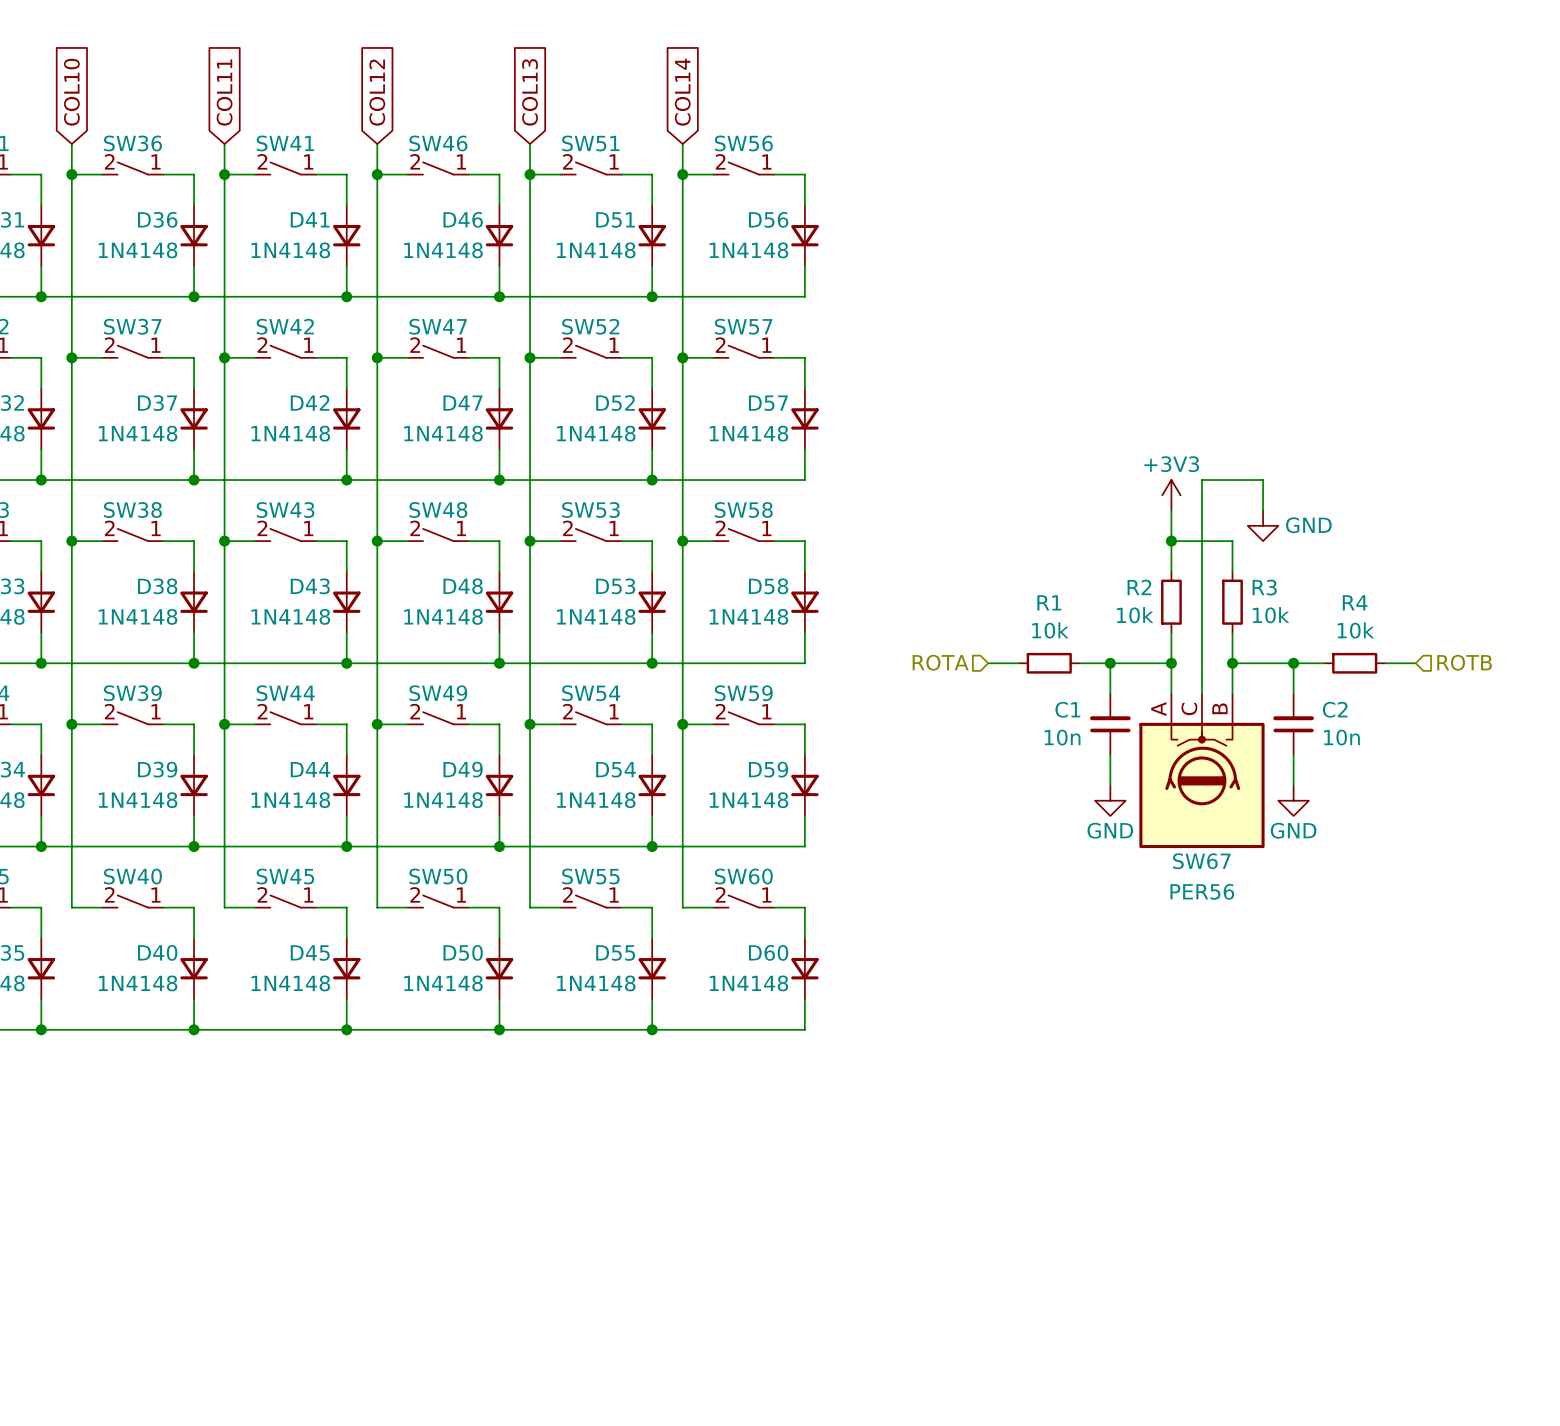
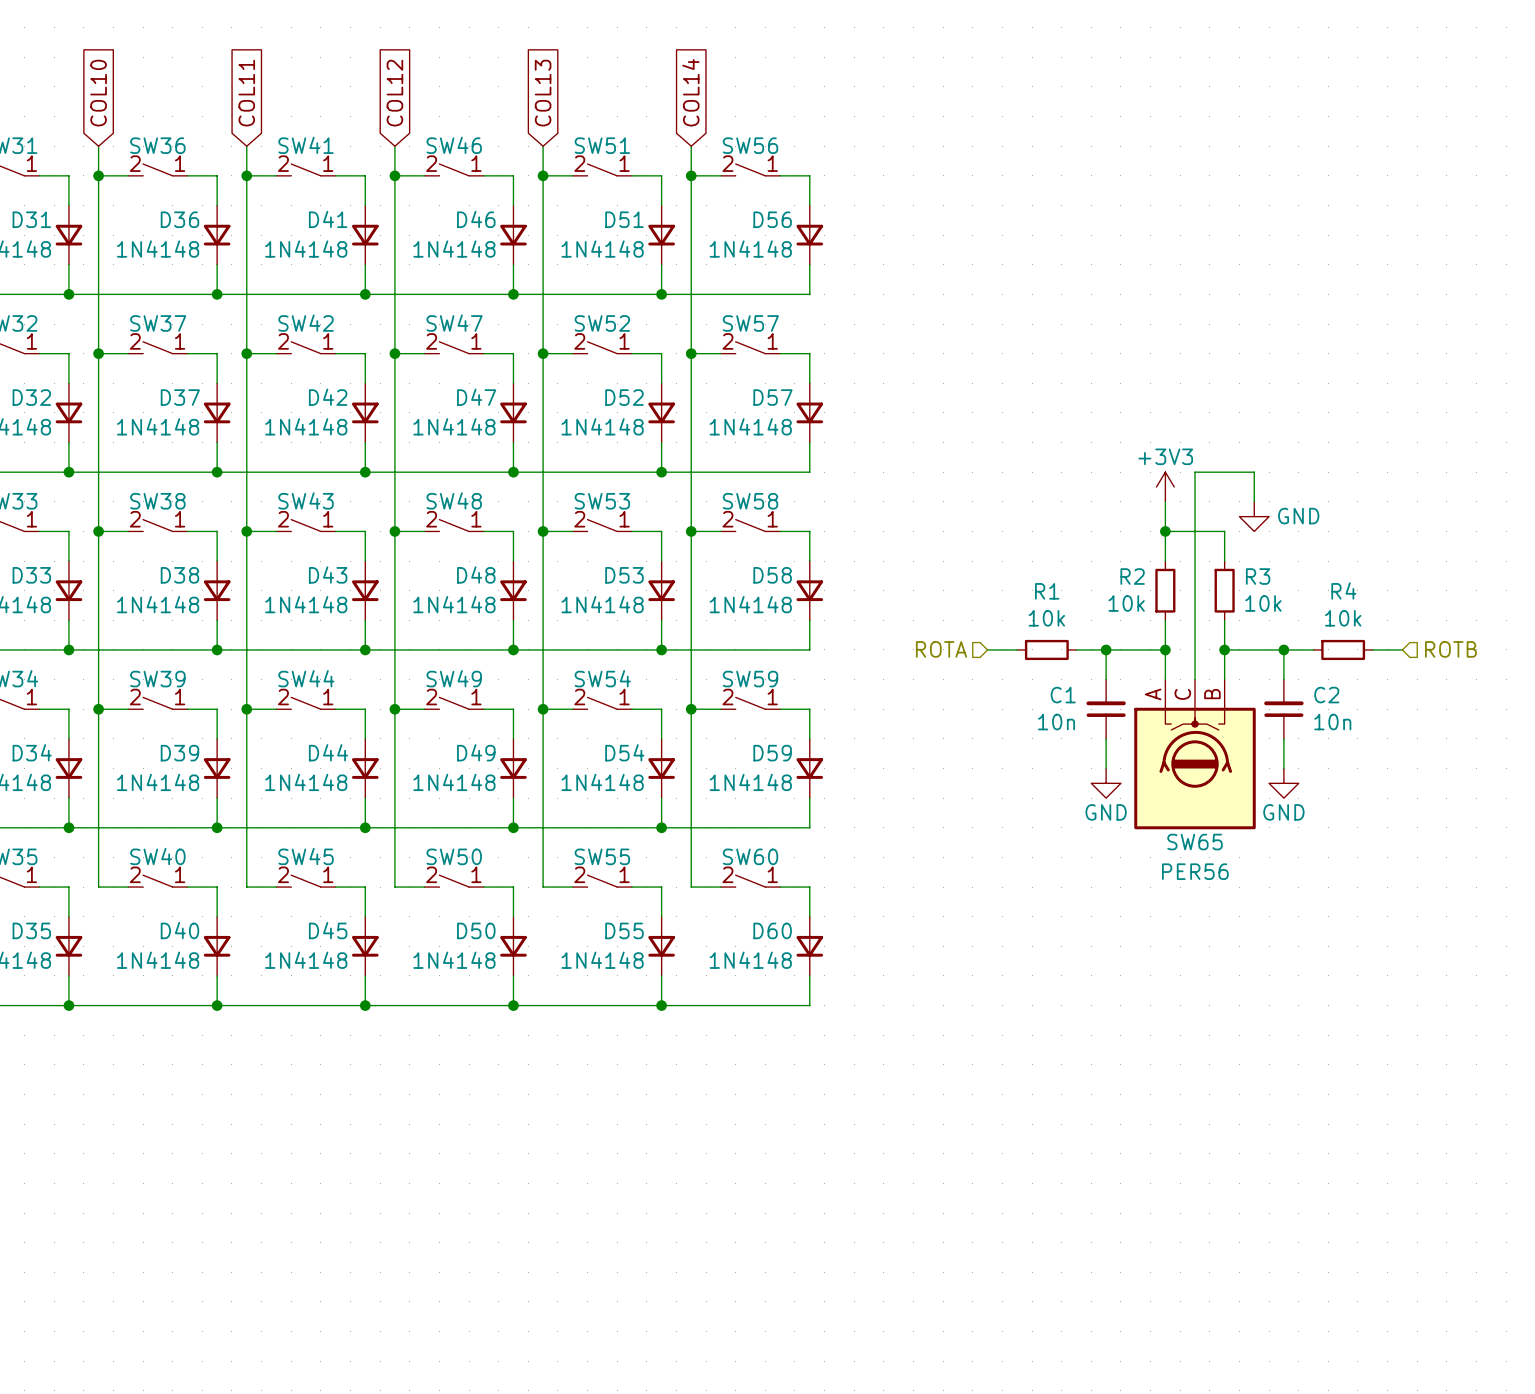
SW67 name: SW67 (1201, 861) -> SW65 (1195, 842)

